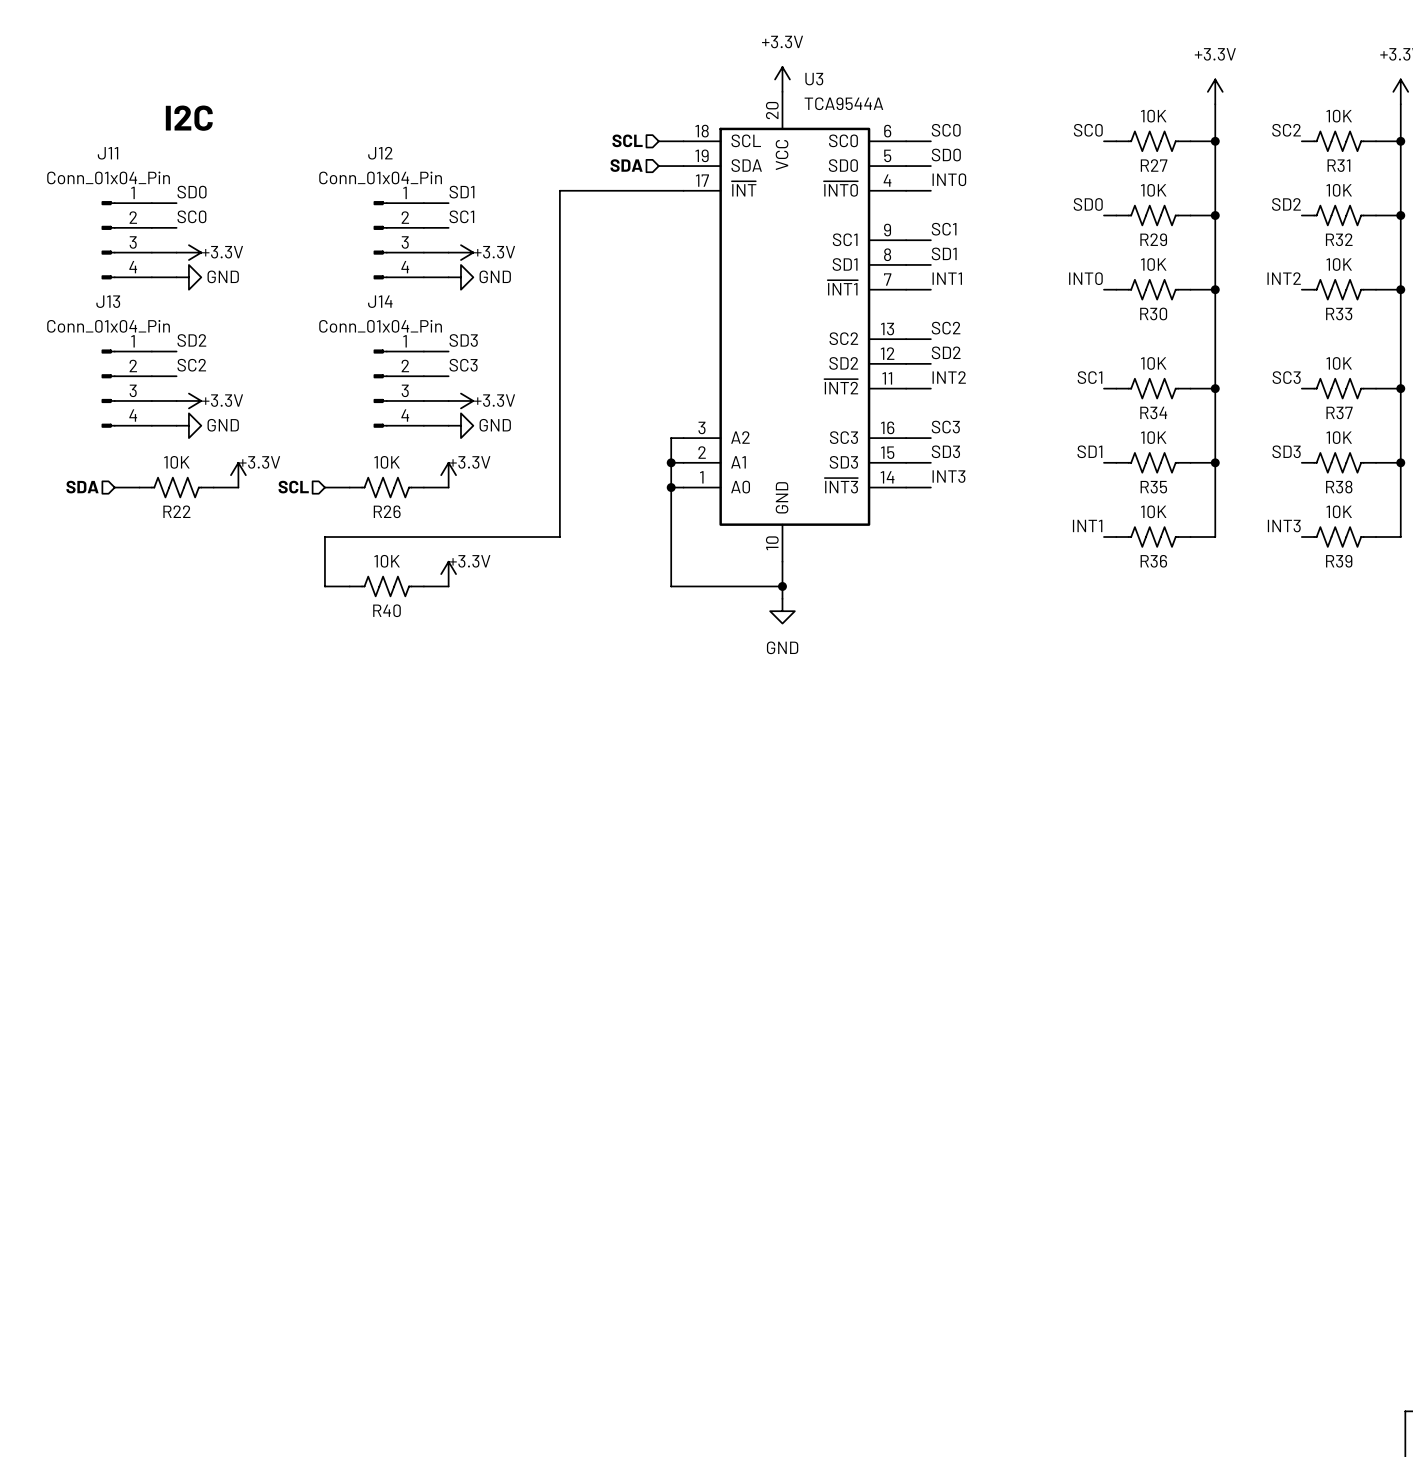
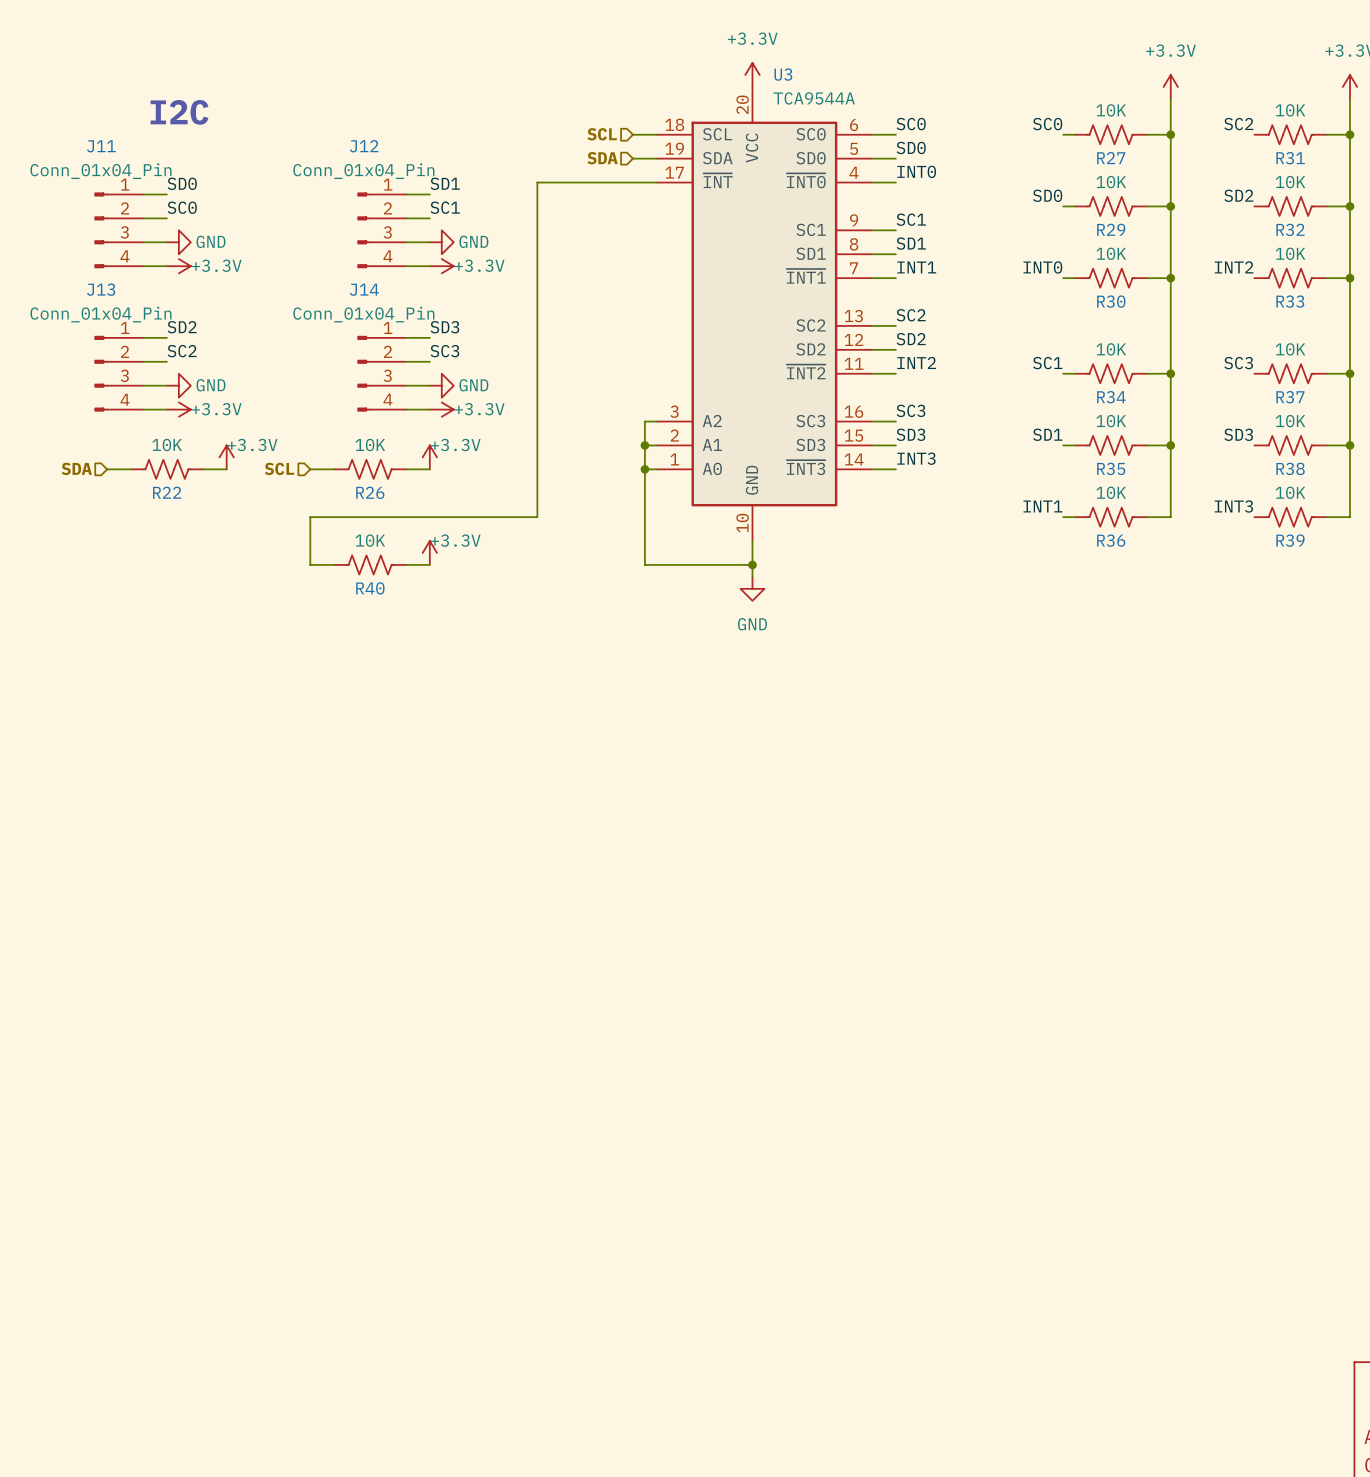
power symbol: +3.3V (188, 252) -> GND (178, 242)
power symbol: +3.3V (460, 252) -> GND (441, 242)
power symbol: GND (188, 277) -> +3.3V (178, 266)
power symbol: GND (460, 277) -> +3.3V (441, 266)
power symbol: +3.3V (188, 400) -> GND (178, 385)
power symbol: +3.3V (460, 400) -> GND (441, 385)
power symbol: GND (188, 425) -> +3.3V (178, 409)
power symbol: GND (460, 425) -> +3.3V (441, 409)

